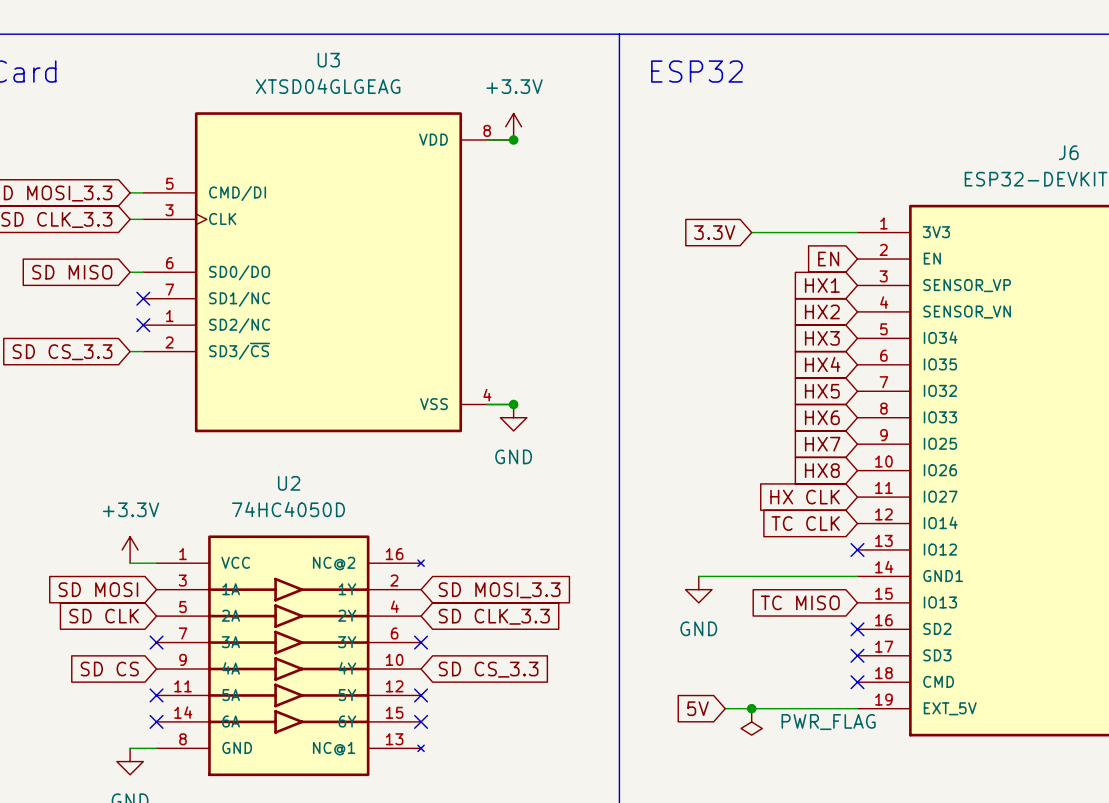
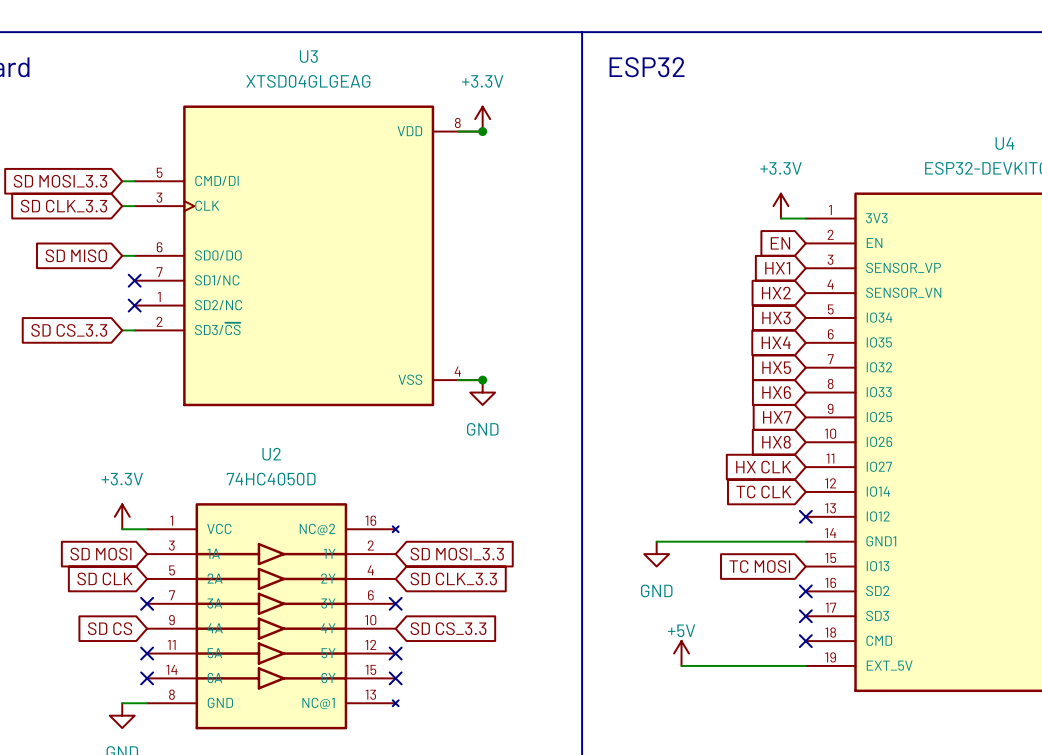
J6 name: J6 (1068, 152) -> U4 (1004, 143)
power symbol: none -> +3.3V (780, 206)
global label: 3.3V (714, 232) -> none
wire: (751, 232) (831, 232) -> none
global label: TC MISO (800, 602) -> TC MOSI (759, 566)
power symbol: none -> +5V (681, 653)
global label: 5V (697, 708) -> none
junction: (751, 708) -> none
power symbol: PWR_FLAG (751, 721) -> none

